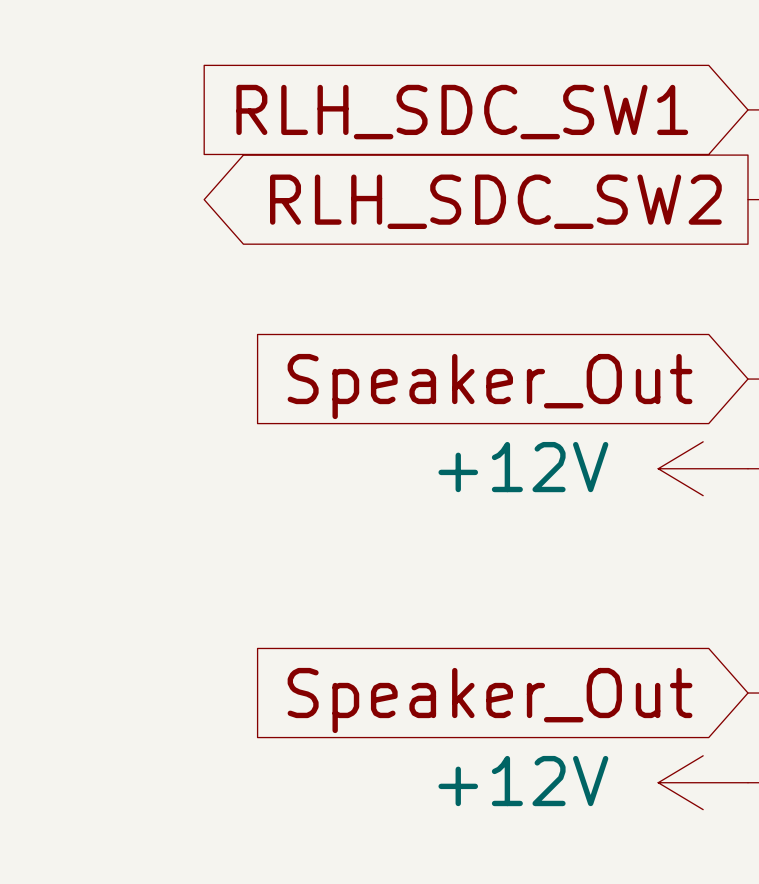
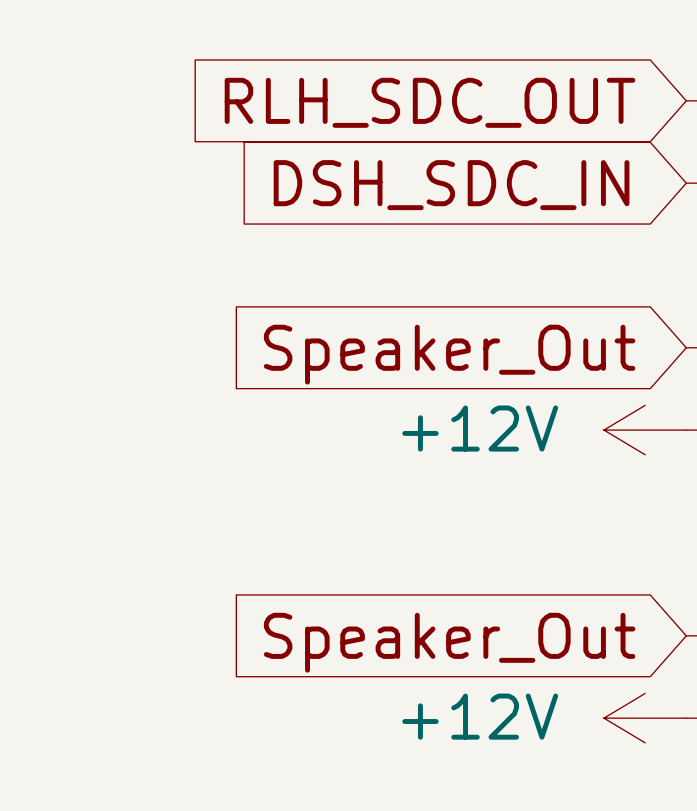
global label: RLH_SDC_SW1 (462, 112) -> RLH_SDC_OUT (429, 102)
global label shape: output (495, 201) -> input (451, 185)
global label: RLH_SDC_SW2 (495, 201) -> DSH_SDC_IN (451, 185)

